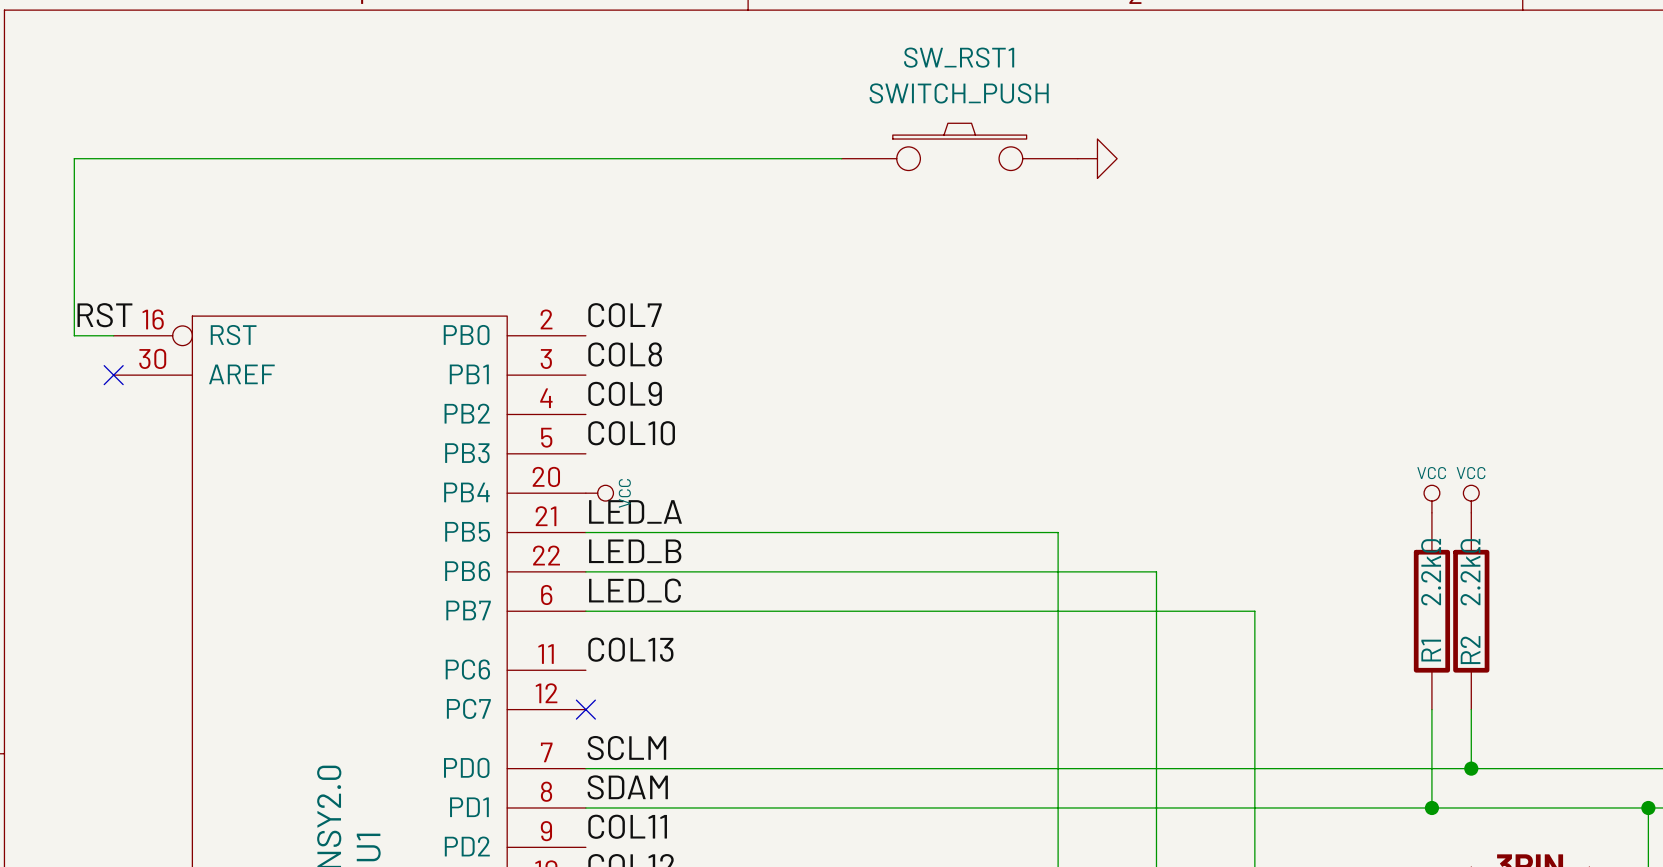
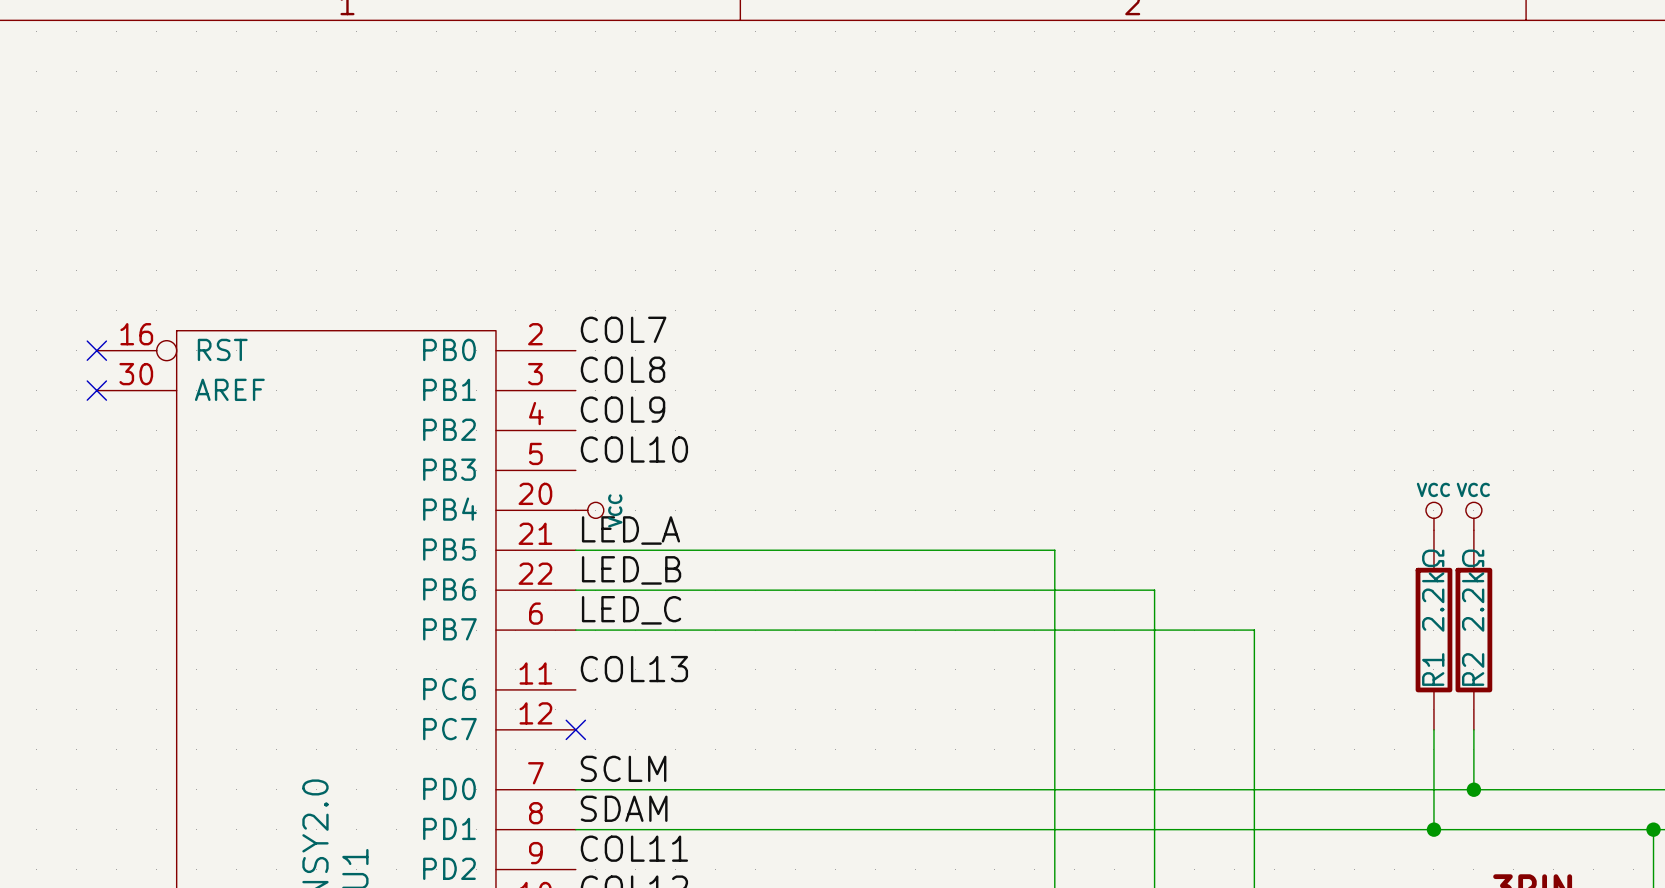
SW_RST1: SWITCH_PUSH (959, 146) -> none
wire: (841, 158) (74, 158) (74, 335) (113, 335) -> none
power symbol: (1097, 158) -> none
label: RST (104, 315) -> none
no-connect mark: none -> (96, 350)

